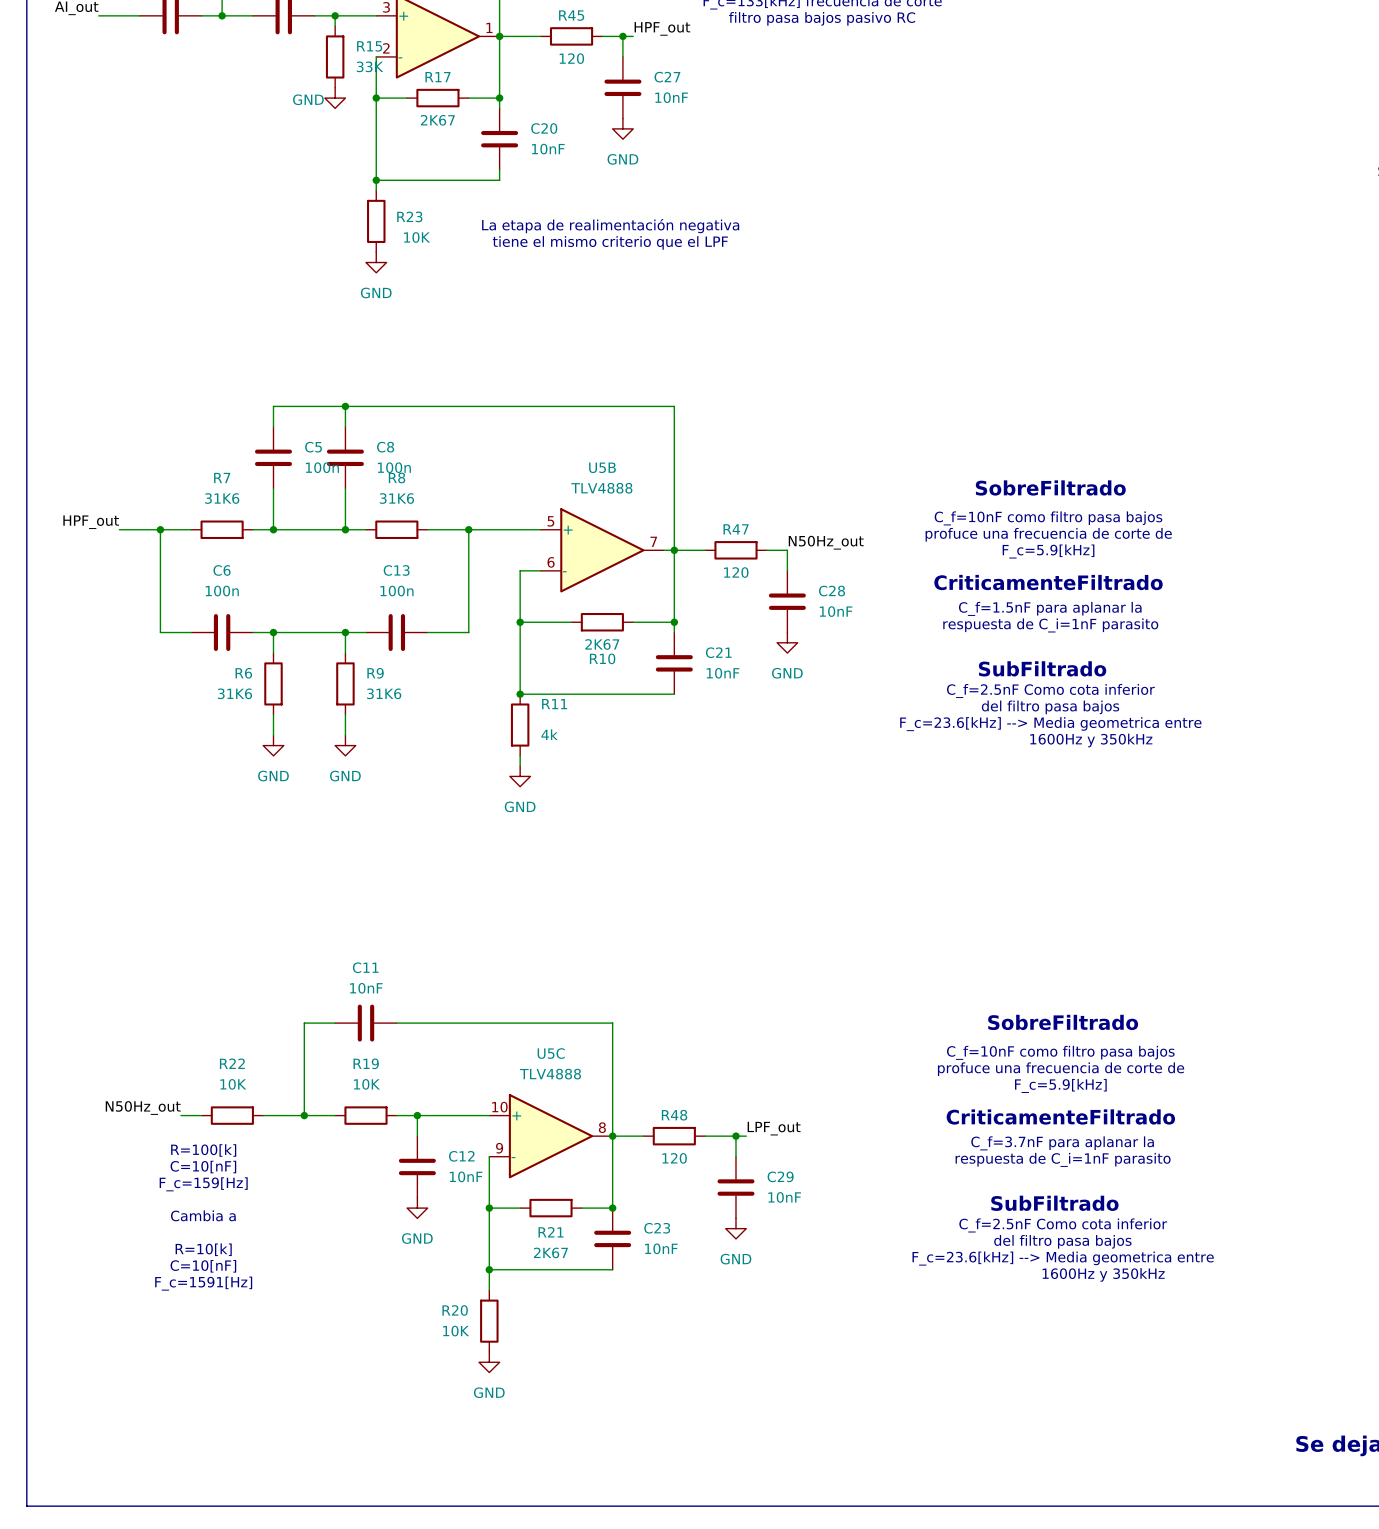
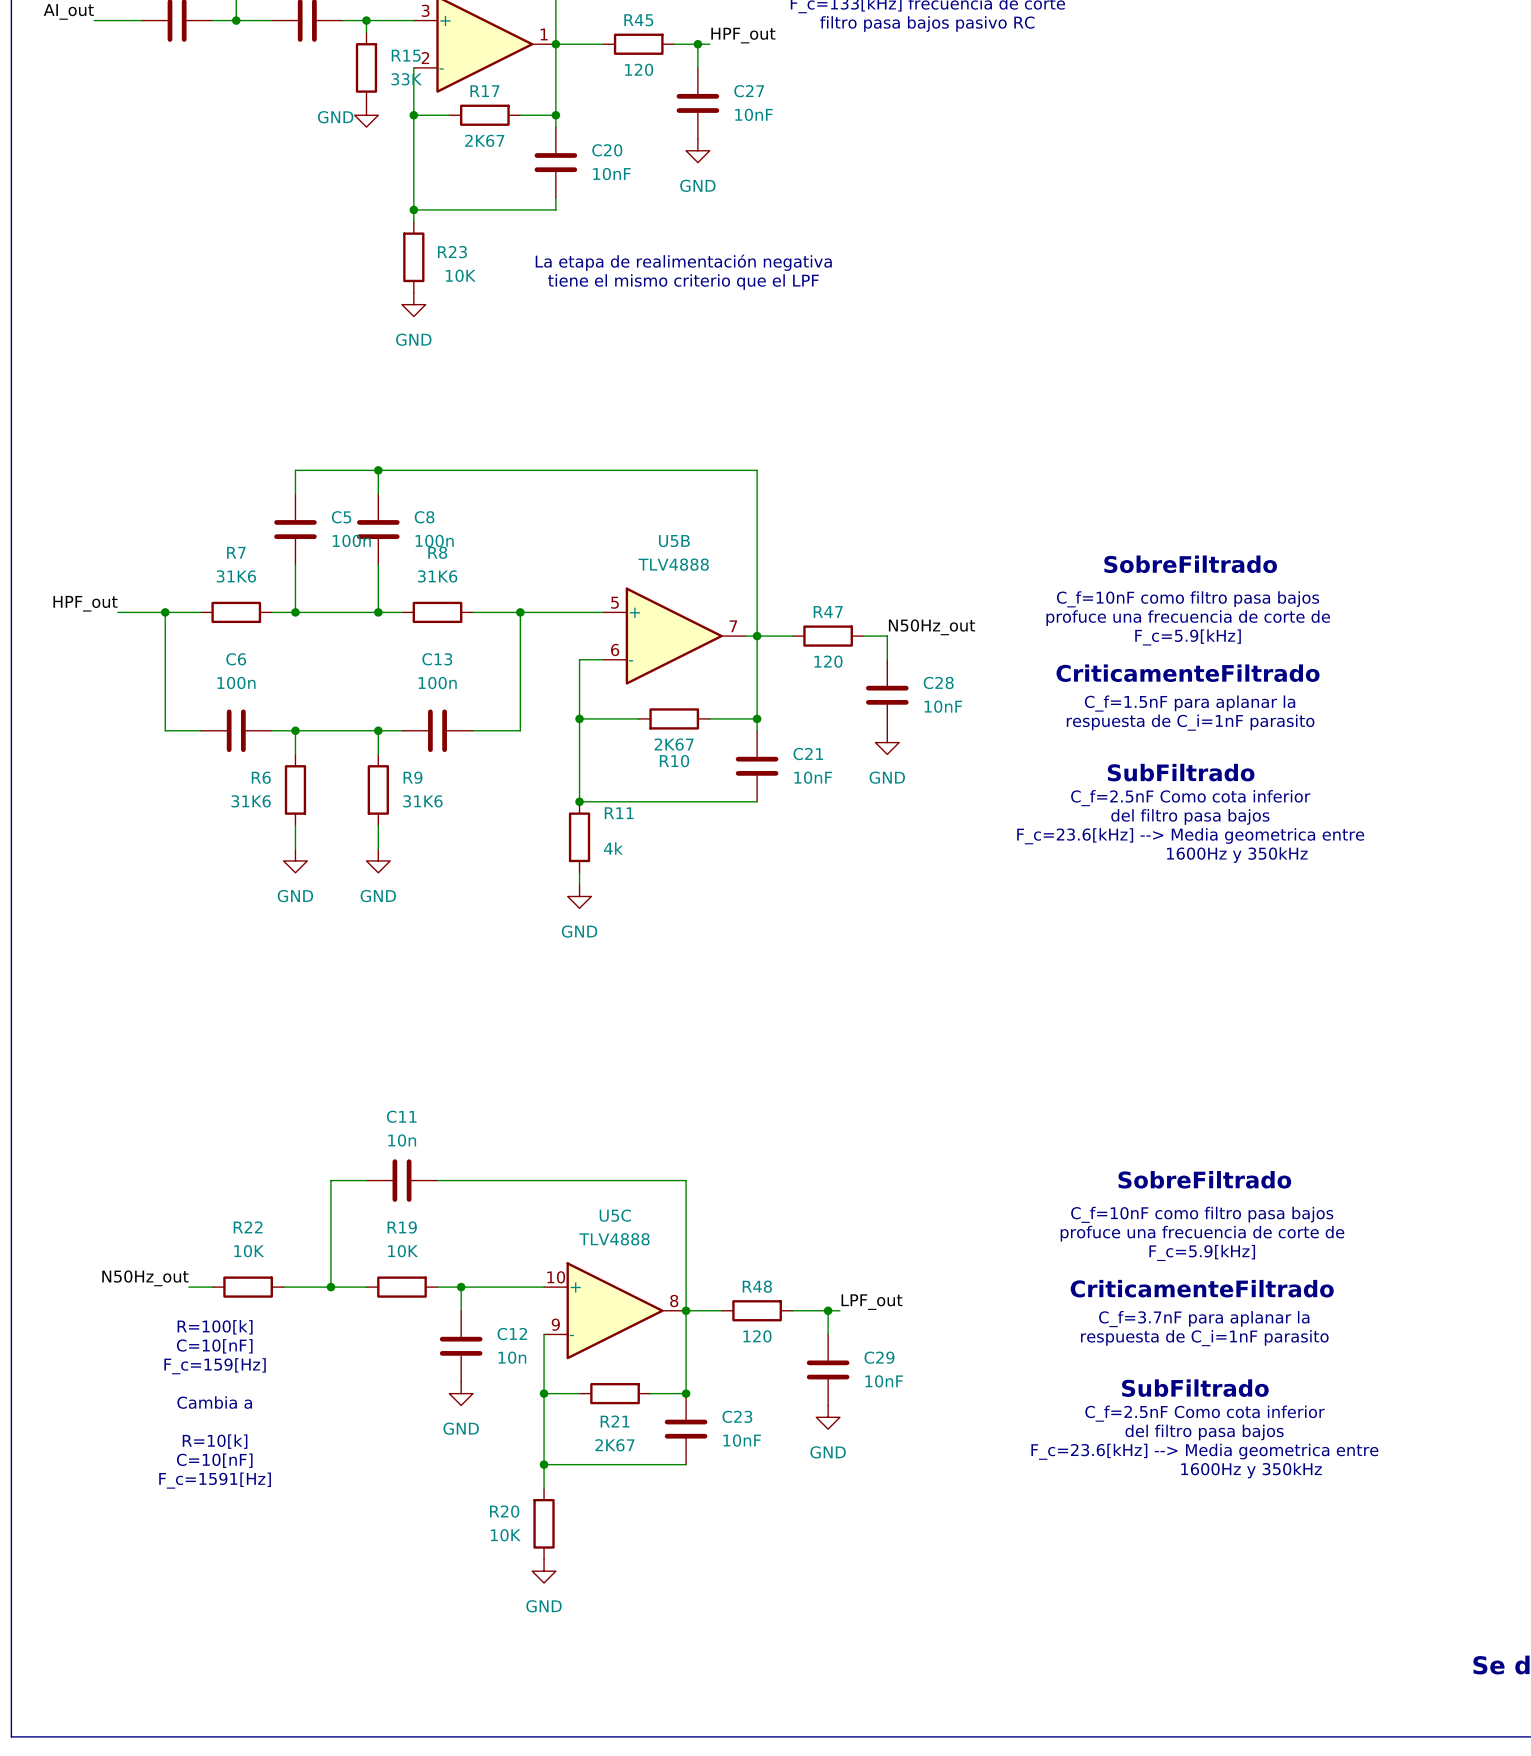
C11 value: 10nF (366, 988) -> 10n (402, 1140)
C12 value: 10nF (466, 1176) -> 10n (512, 1357)

